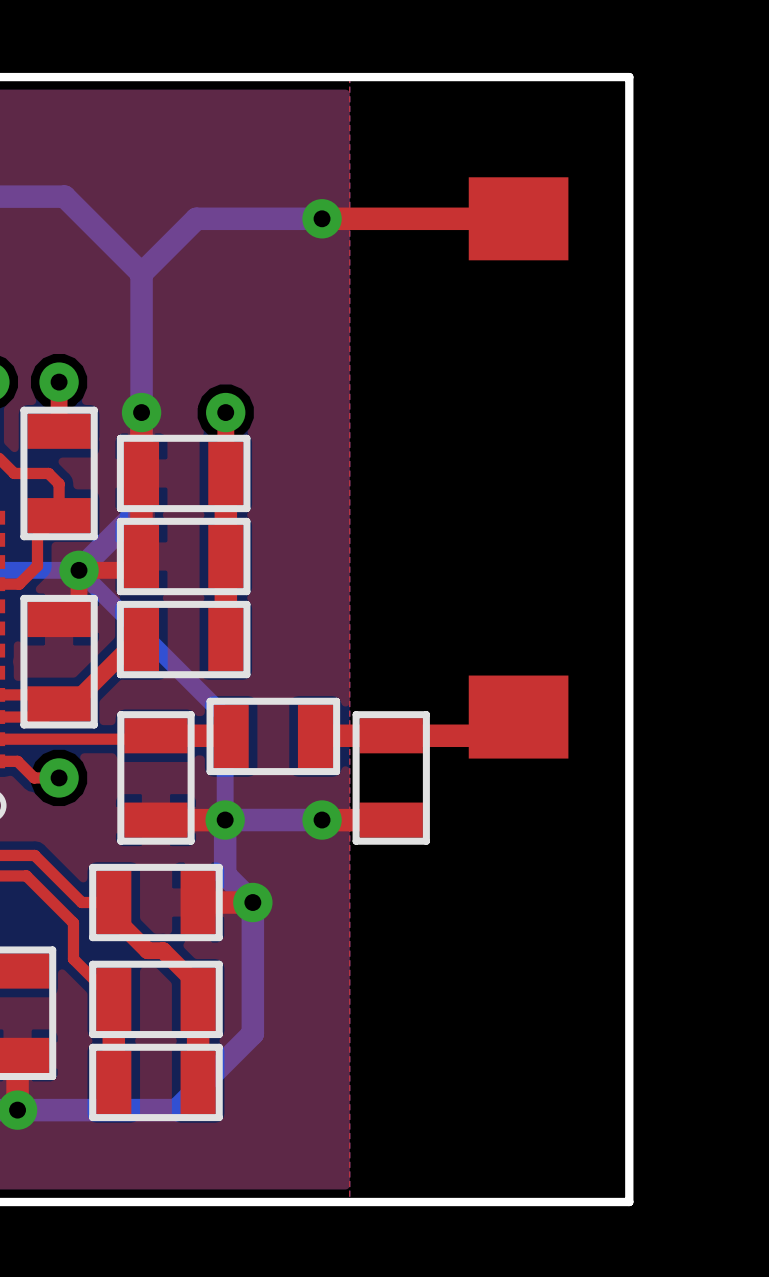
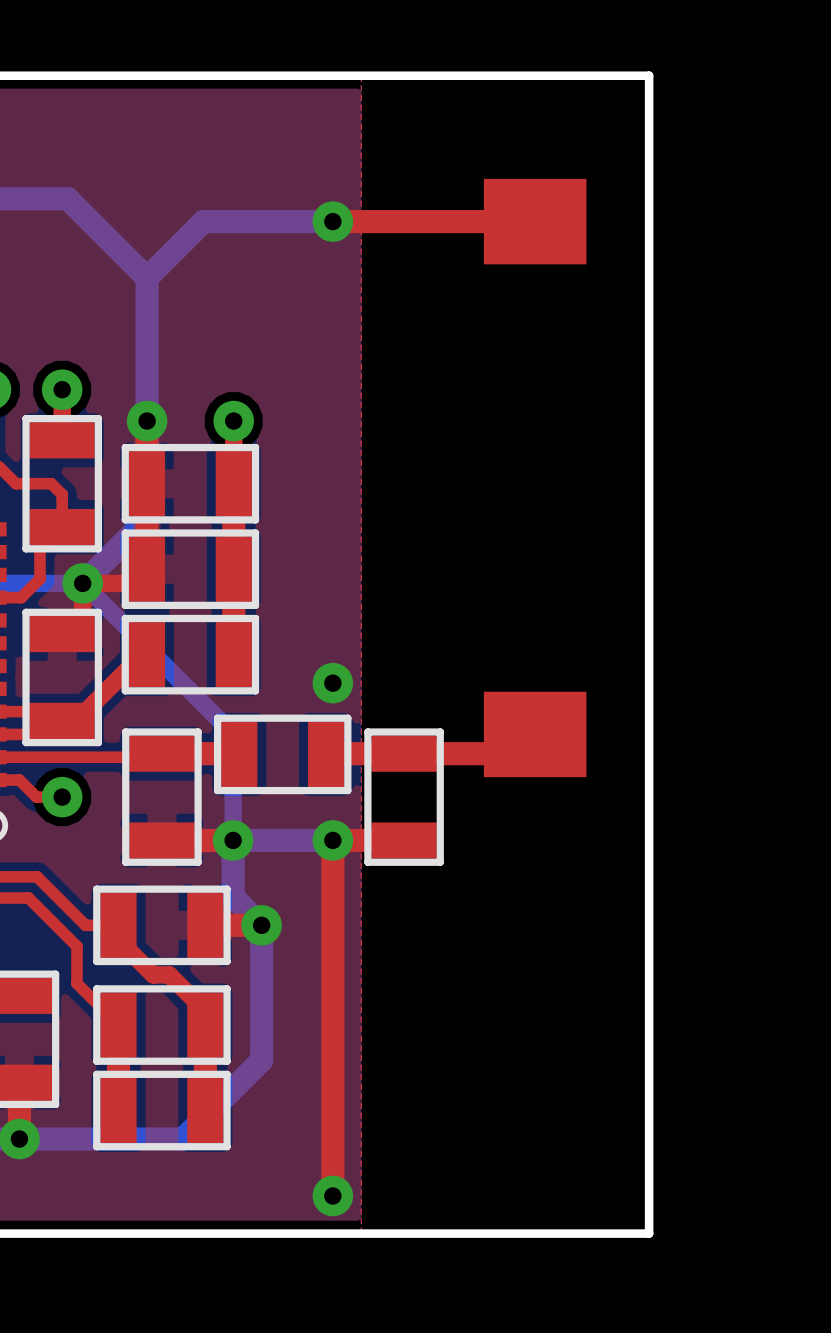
via: none -> (332, 683)
top track: none -> (332, 840) (332, 1195)
via: none -> (332, 1195)

